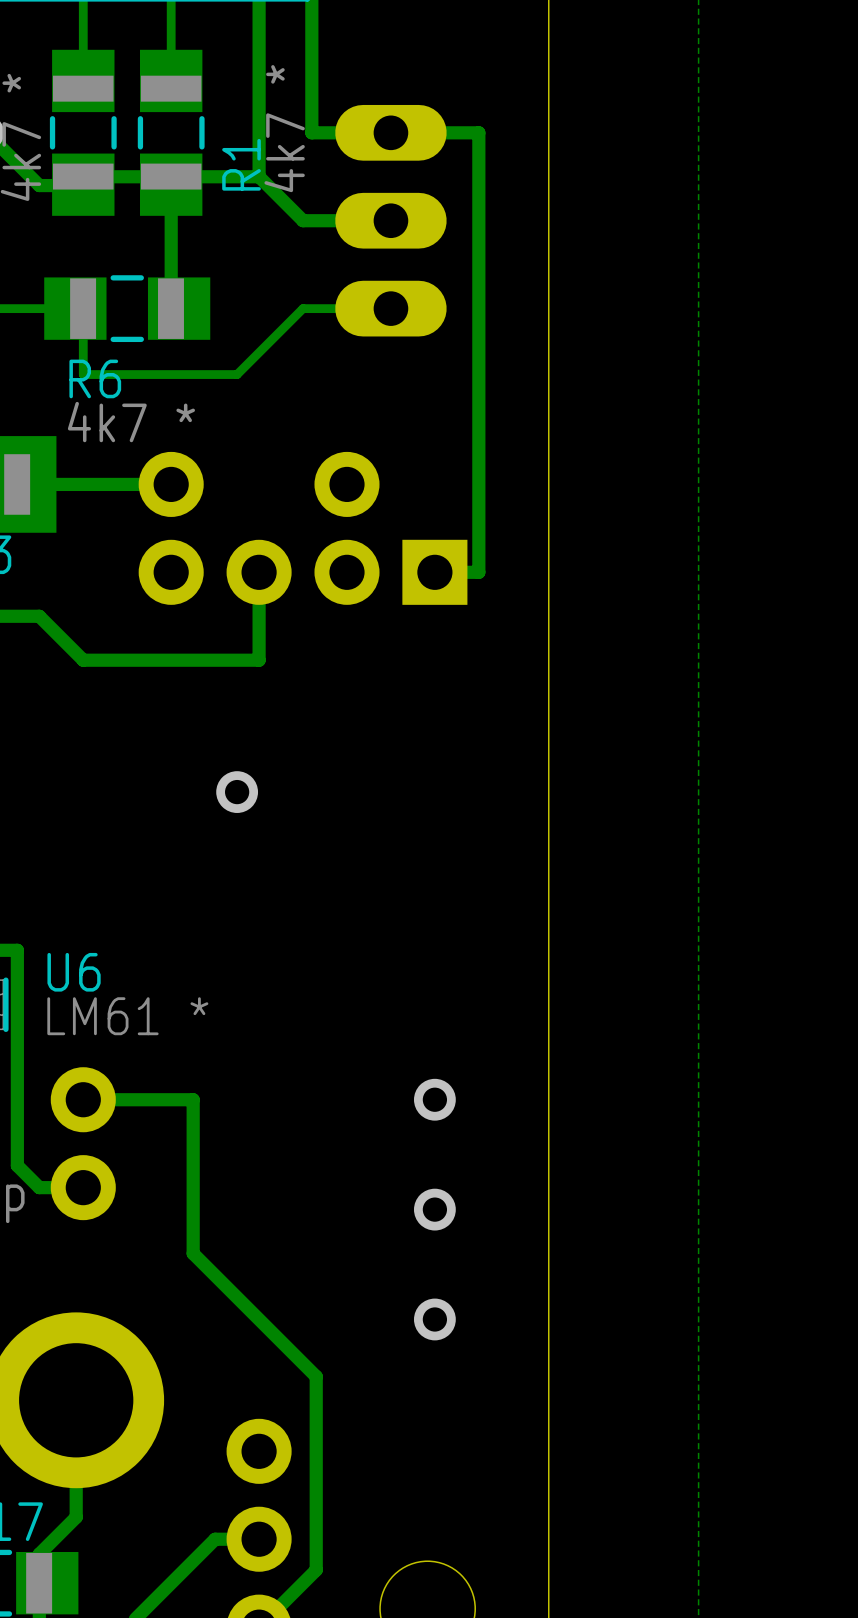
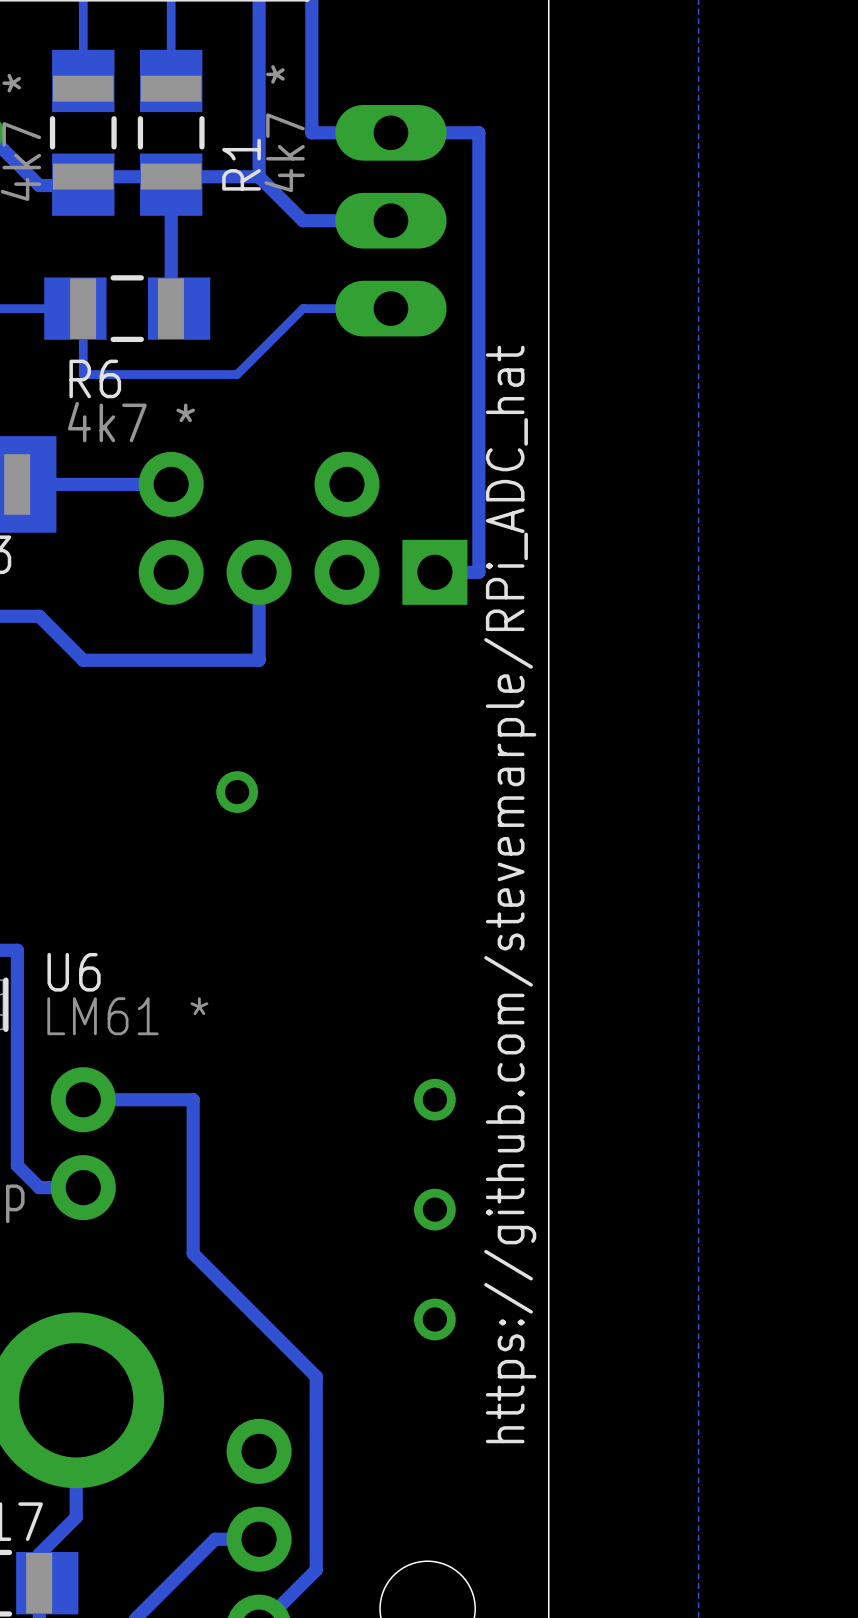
text: none -> https://github.com/stevemarple/RPi_ADC_hat (510, 894)

